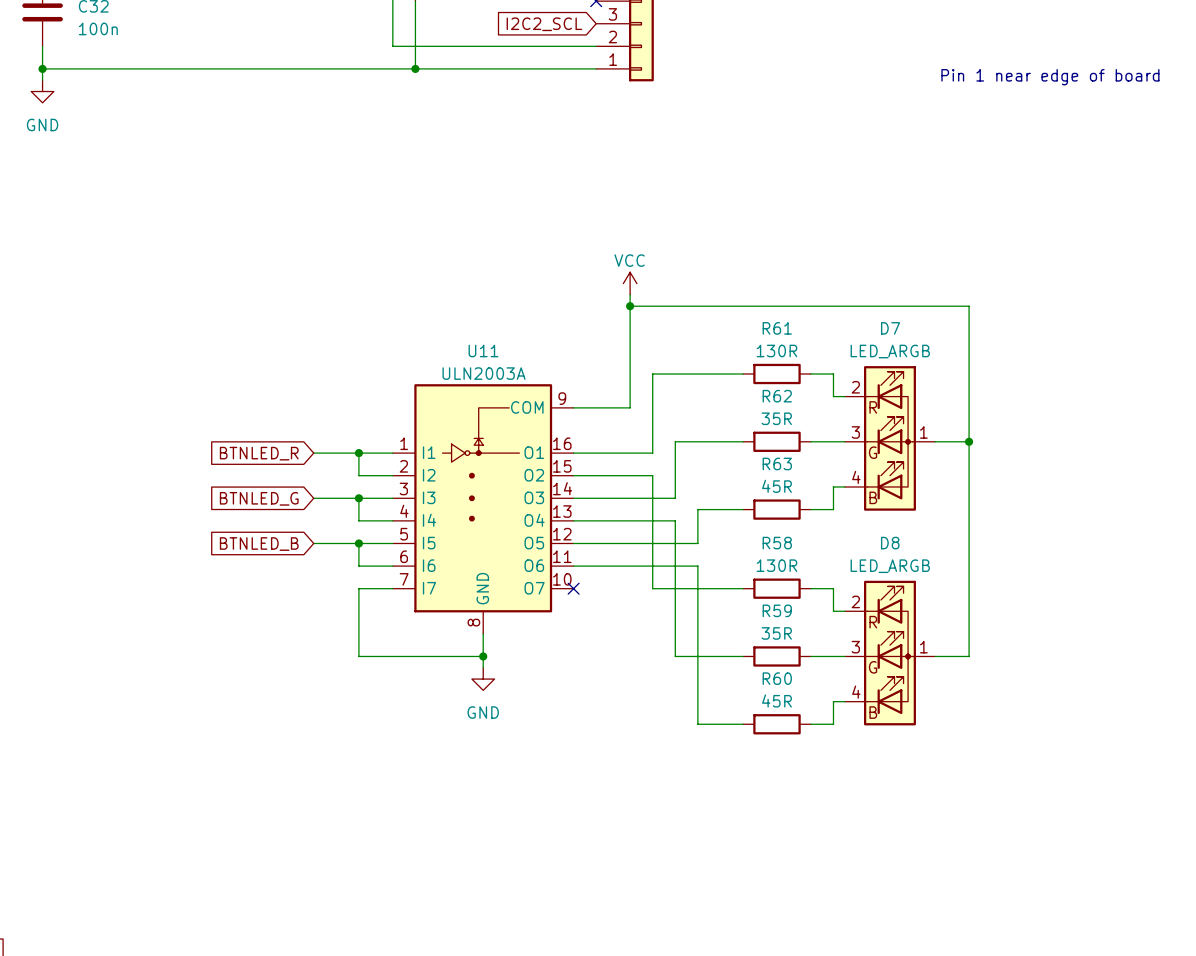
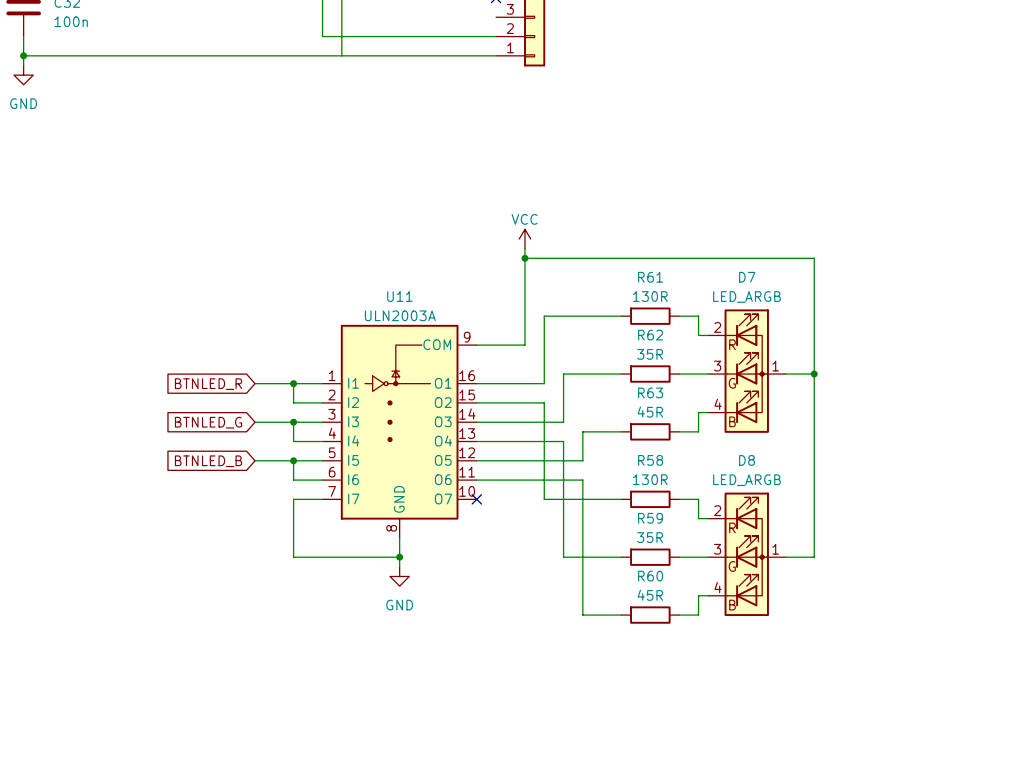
global label: I2C2_SCL (544, 24) -> none
junction: (415, 68) -> none
text: Pin 1 near edge of board (1050, 77) -> none

